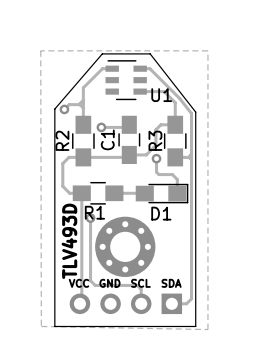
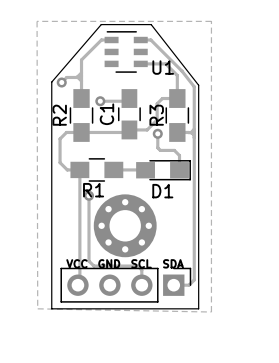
text: TLV493D (69, 241) -> none
part side: bottom (125, 303) -> top (125, 285)

